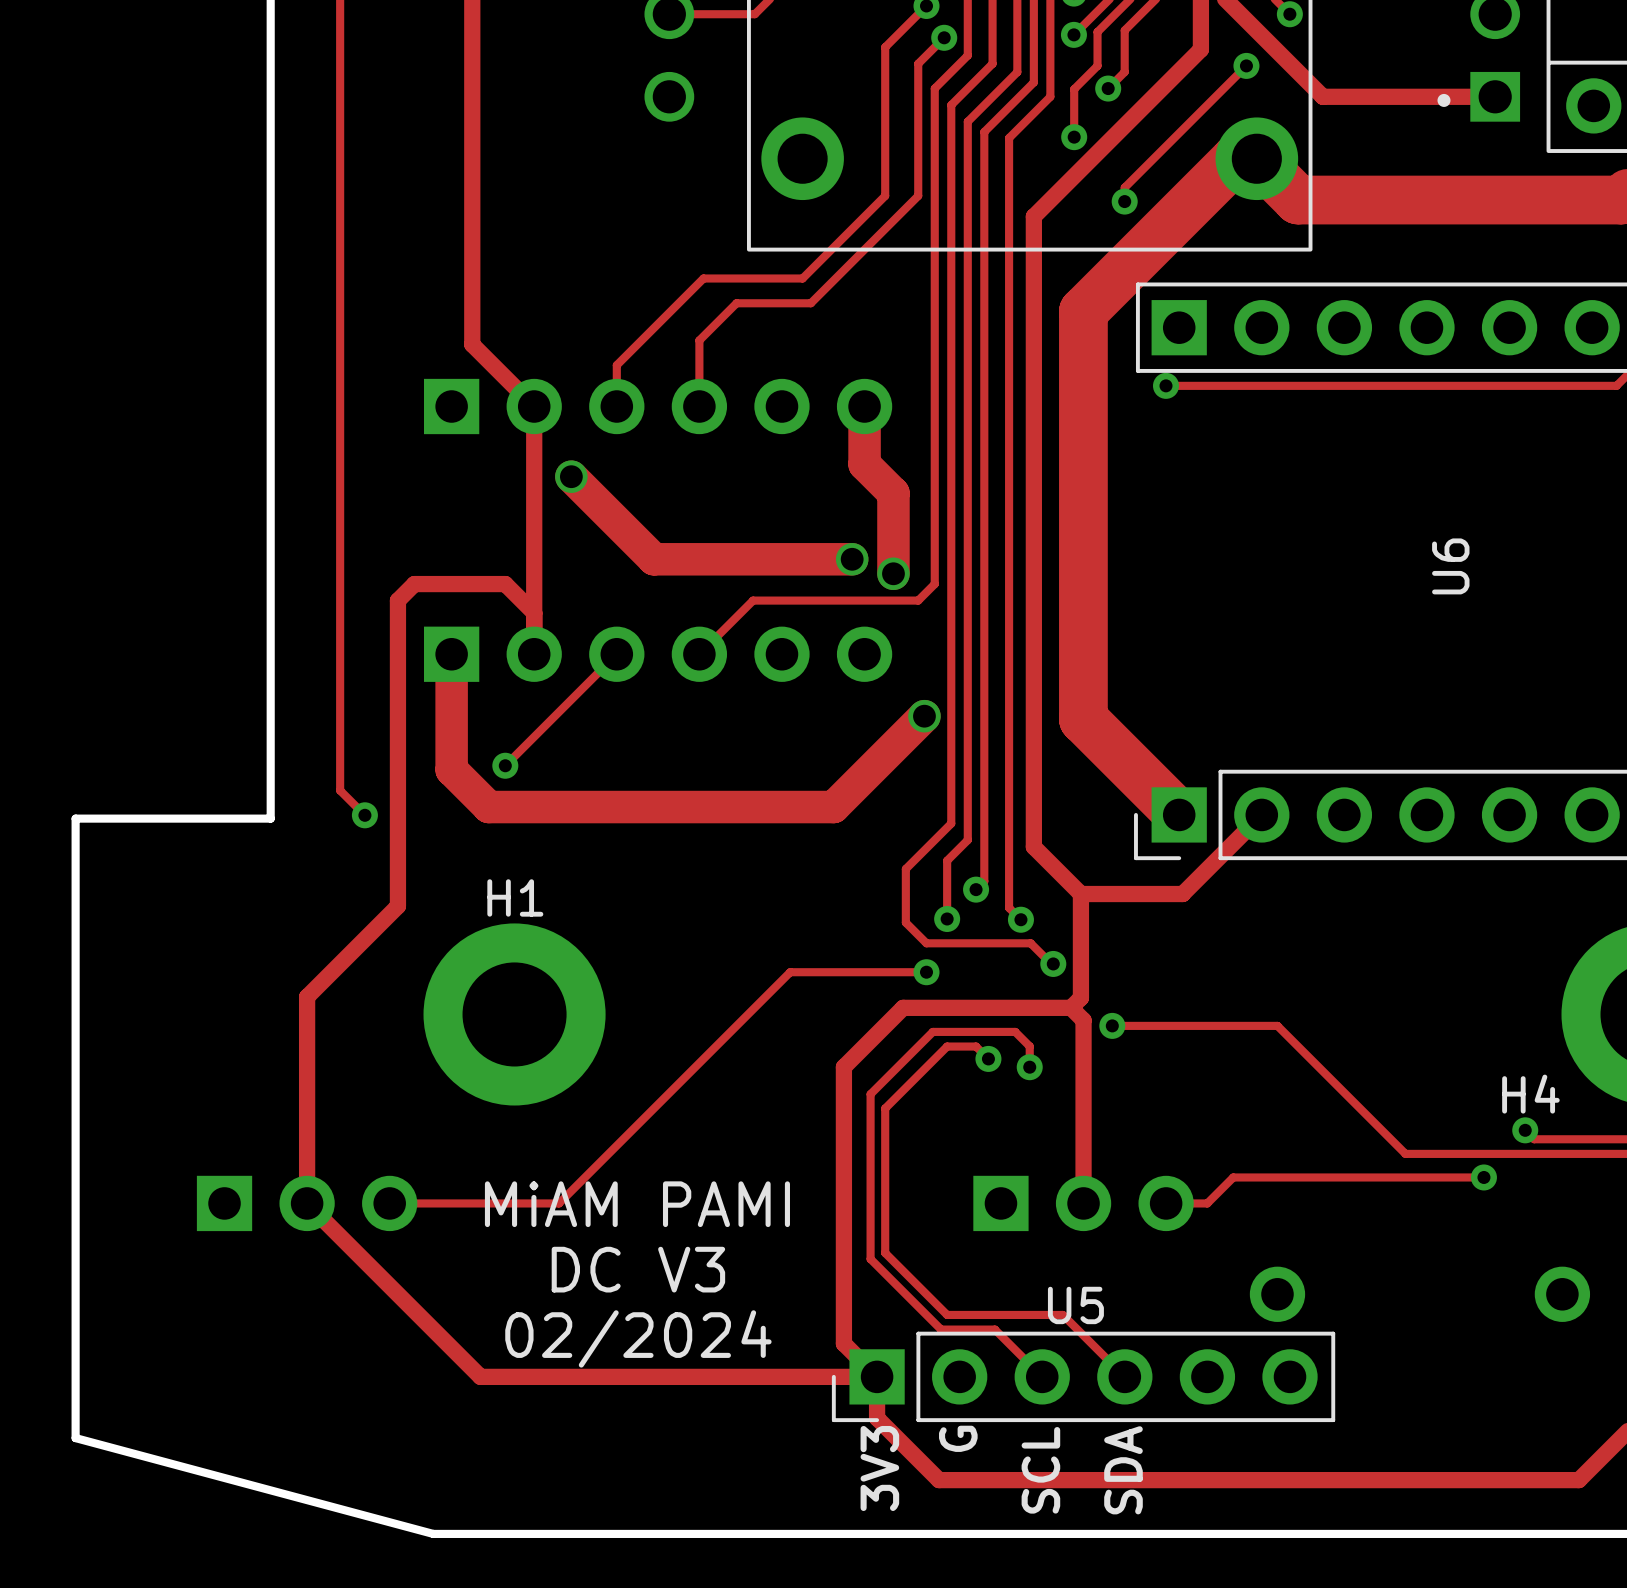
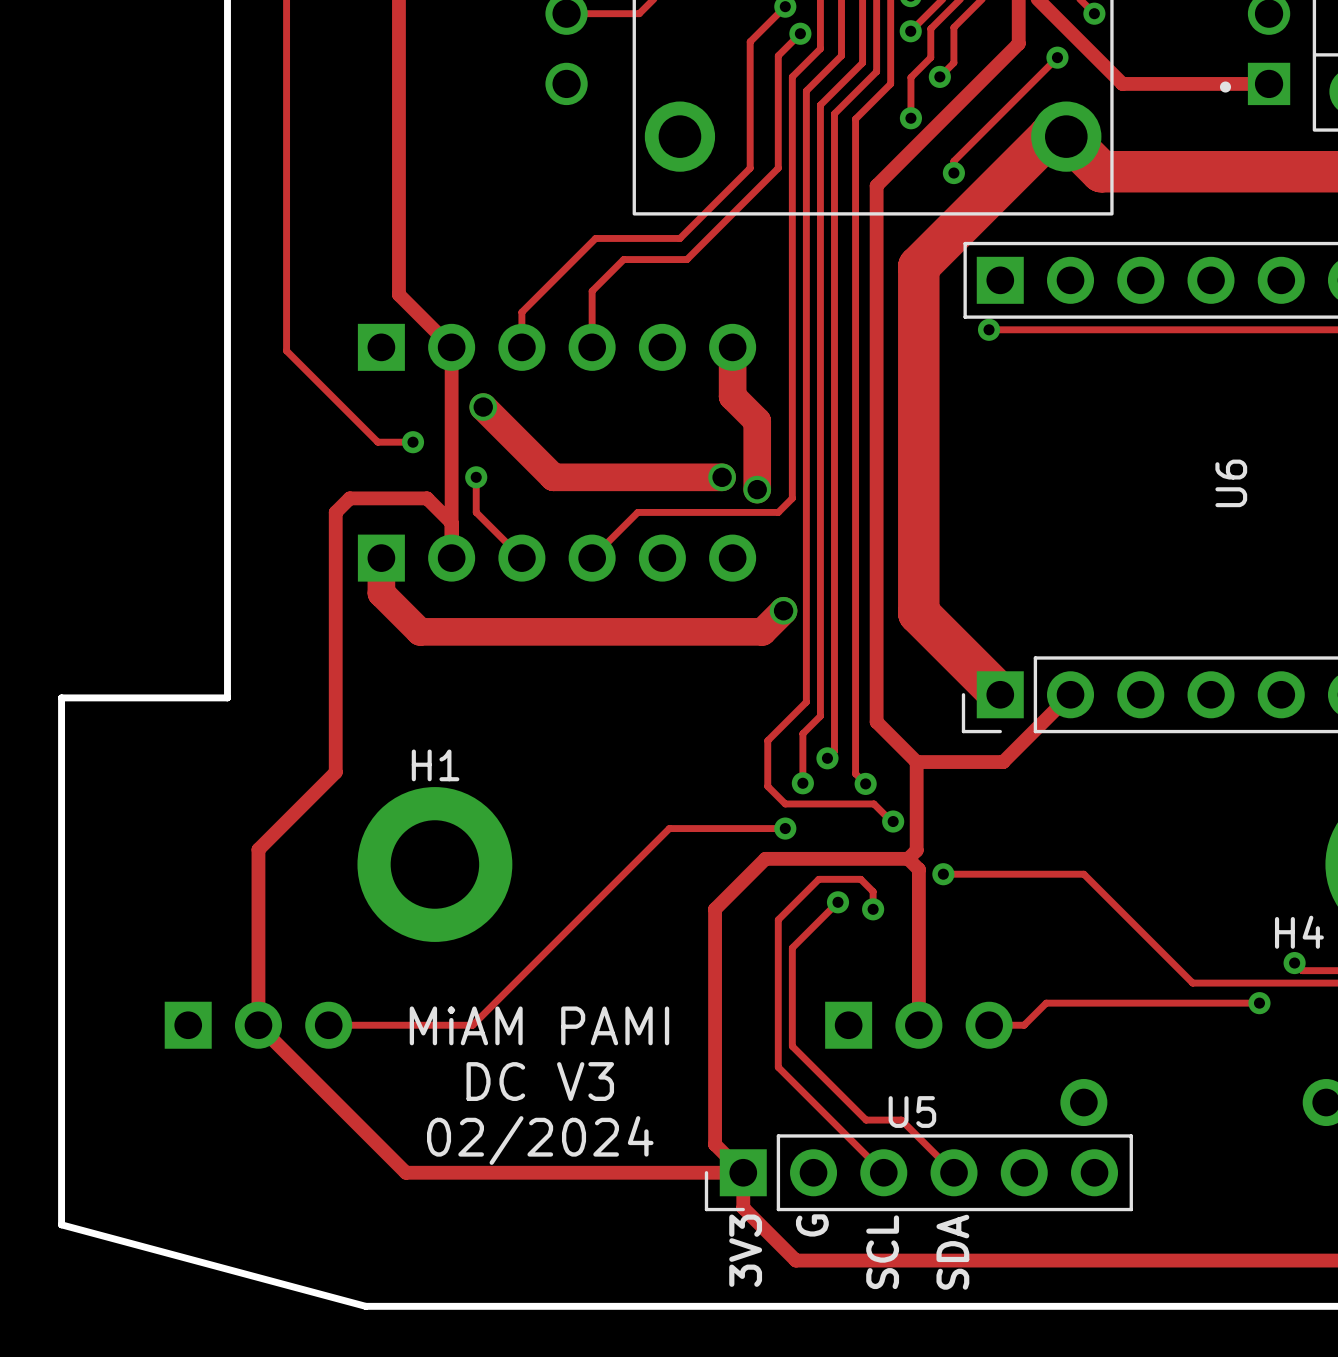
track: (340, 410) (340, 790) (364, 815) -> (286, 350) (377, 442) (413, 442)
via: none -> (413, 442)
via: none -> (476, 477)
track: (616, 654) (505, 765) -> (521, 558) (476, 512) (476, 477)
track: (451, 695) (451, 769) (488, 807) (833, 807) (899, 740) -> (381, 593) (420, 631) (762, 631)
via: (505, 765) -> none
via: (364, 815) -> none
track: (965, 1031) (932, 1031) (870, 1094) (870, 1259) (941, 1329) (994, 1329) -> (818, 879) (778, 919) (778, 1067) (843, 1132)
track: (988, 1058) (976, 1046) (947, 1046) (885, 1108) (885, 1253) (947, 1314) (1021, 1314) -> (838, 902) (792, 947) (792, 1046) (866, 1120)

